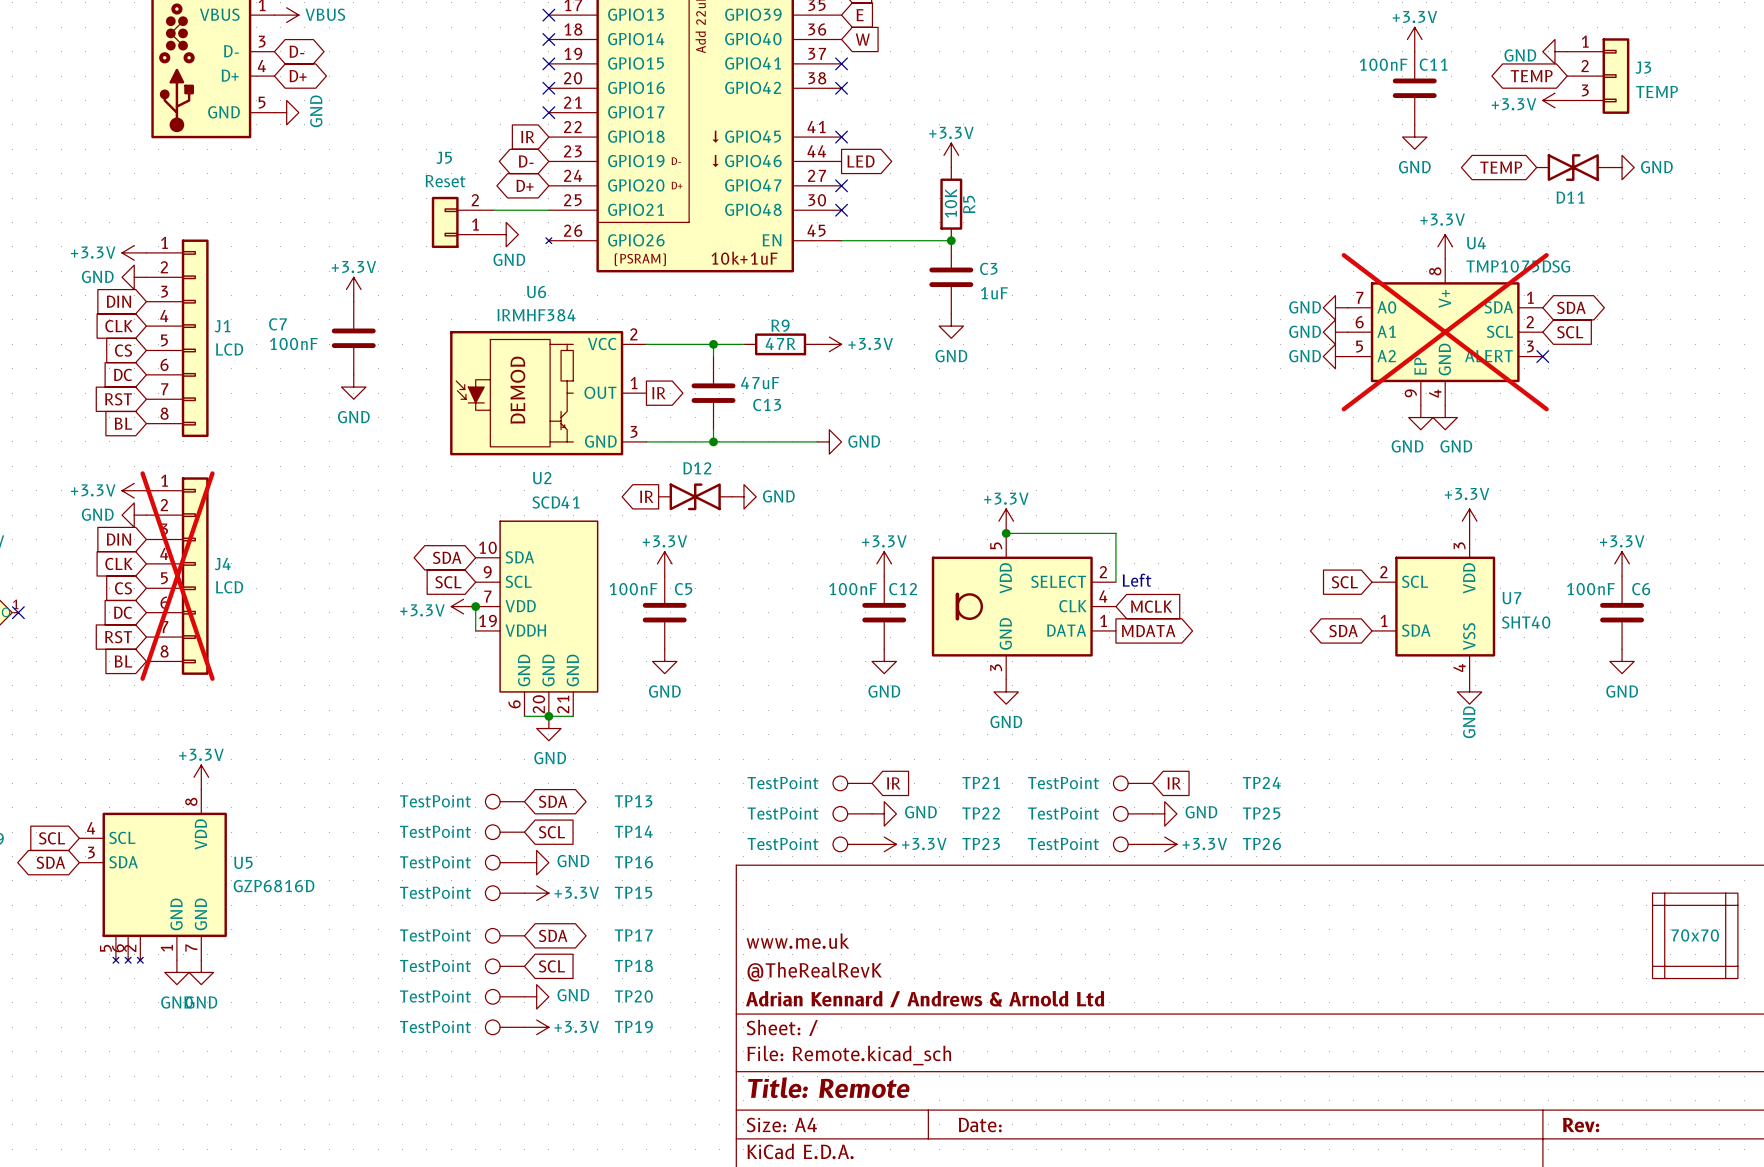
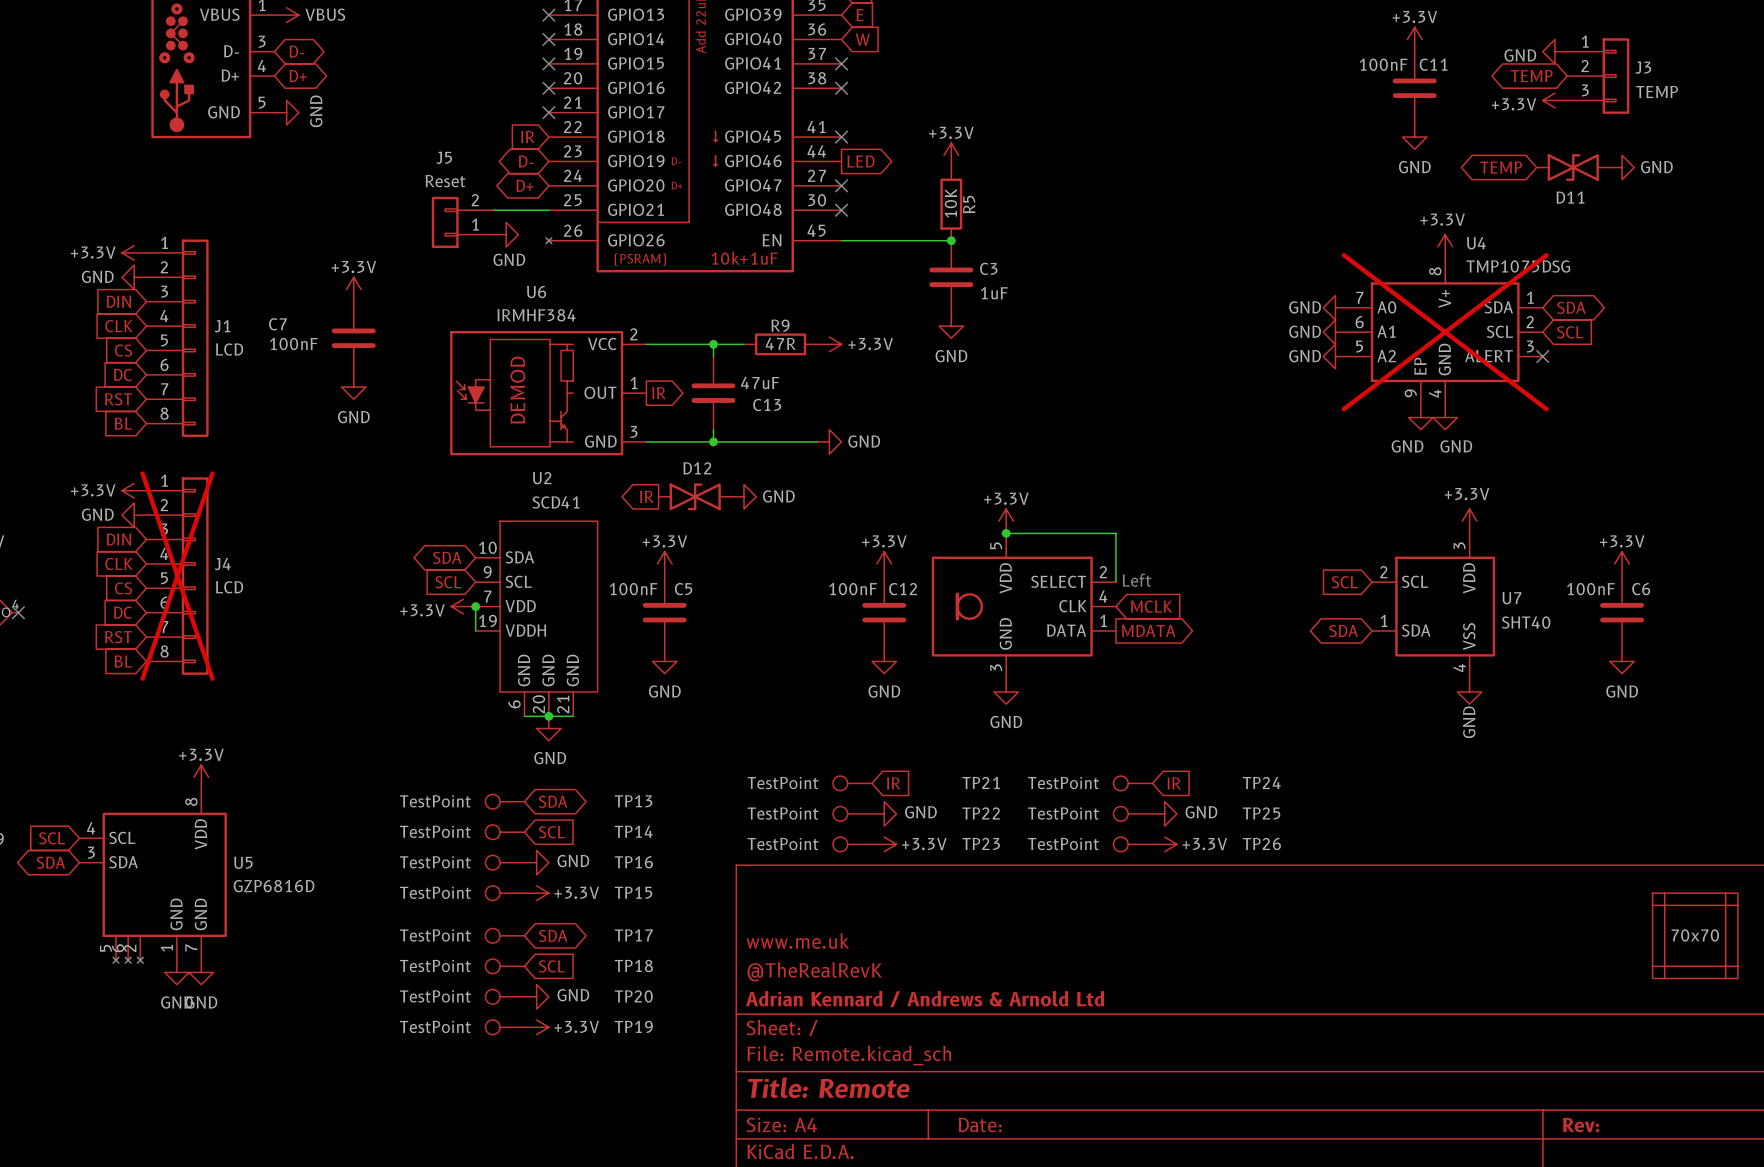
part pin number: 1 (15, 604) -> 4 (15, 604)

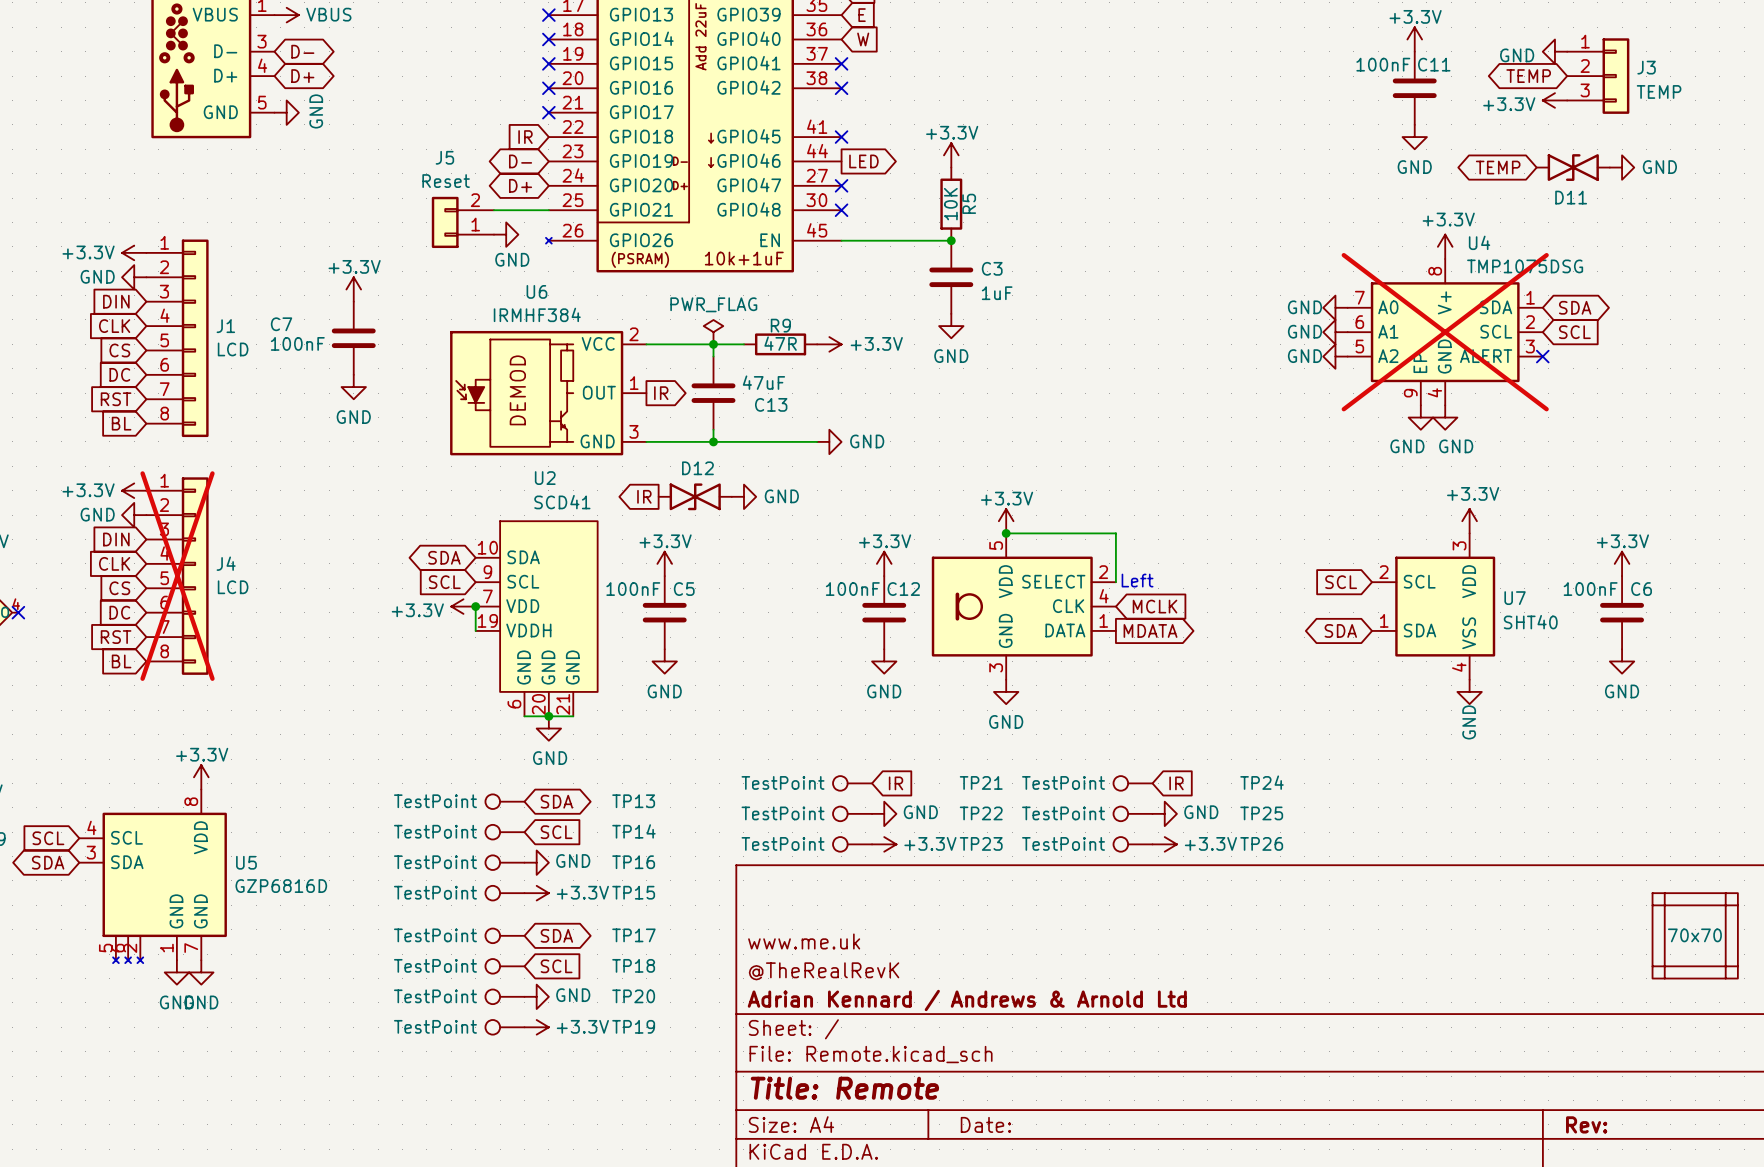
power symbol: none -> PWR_FLAG (713, 332)

